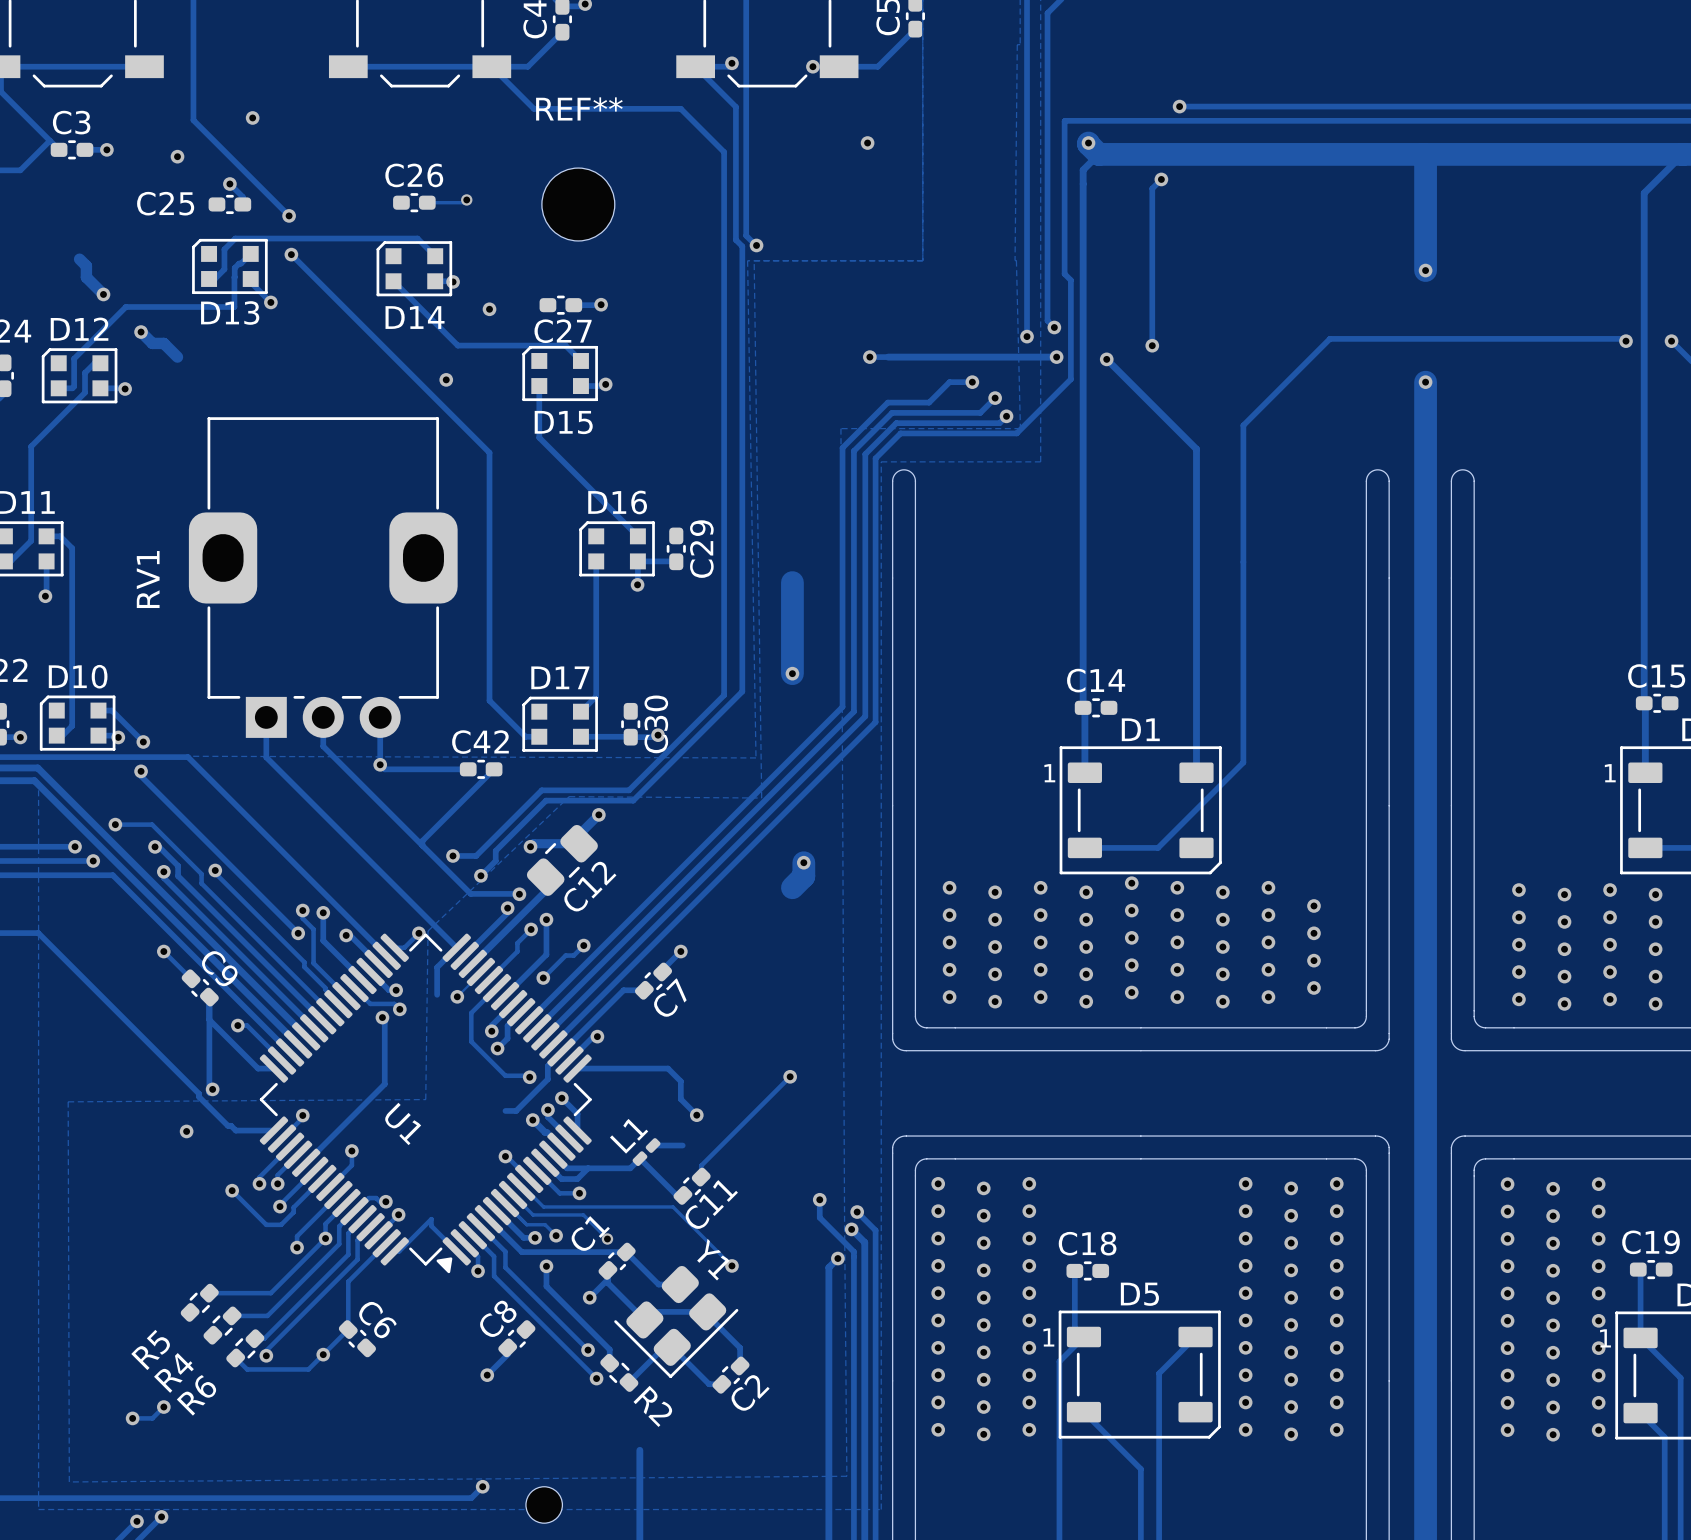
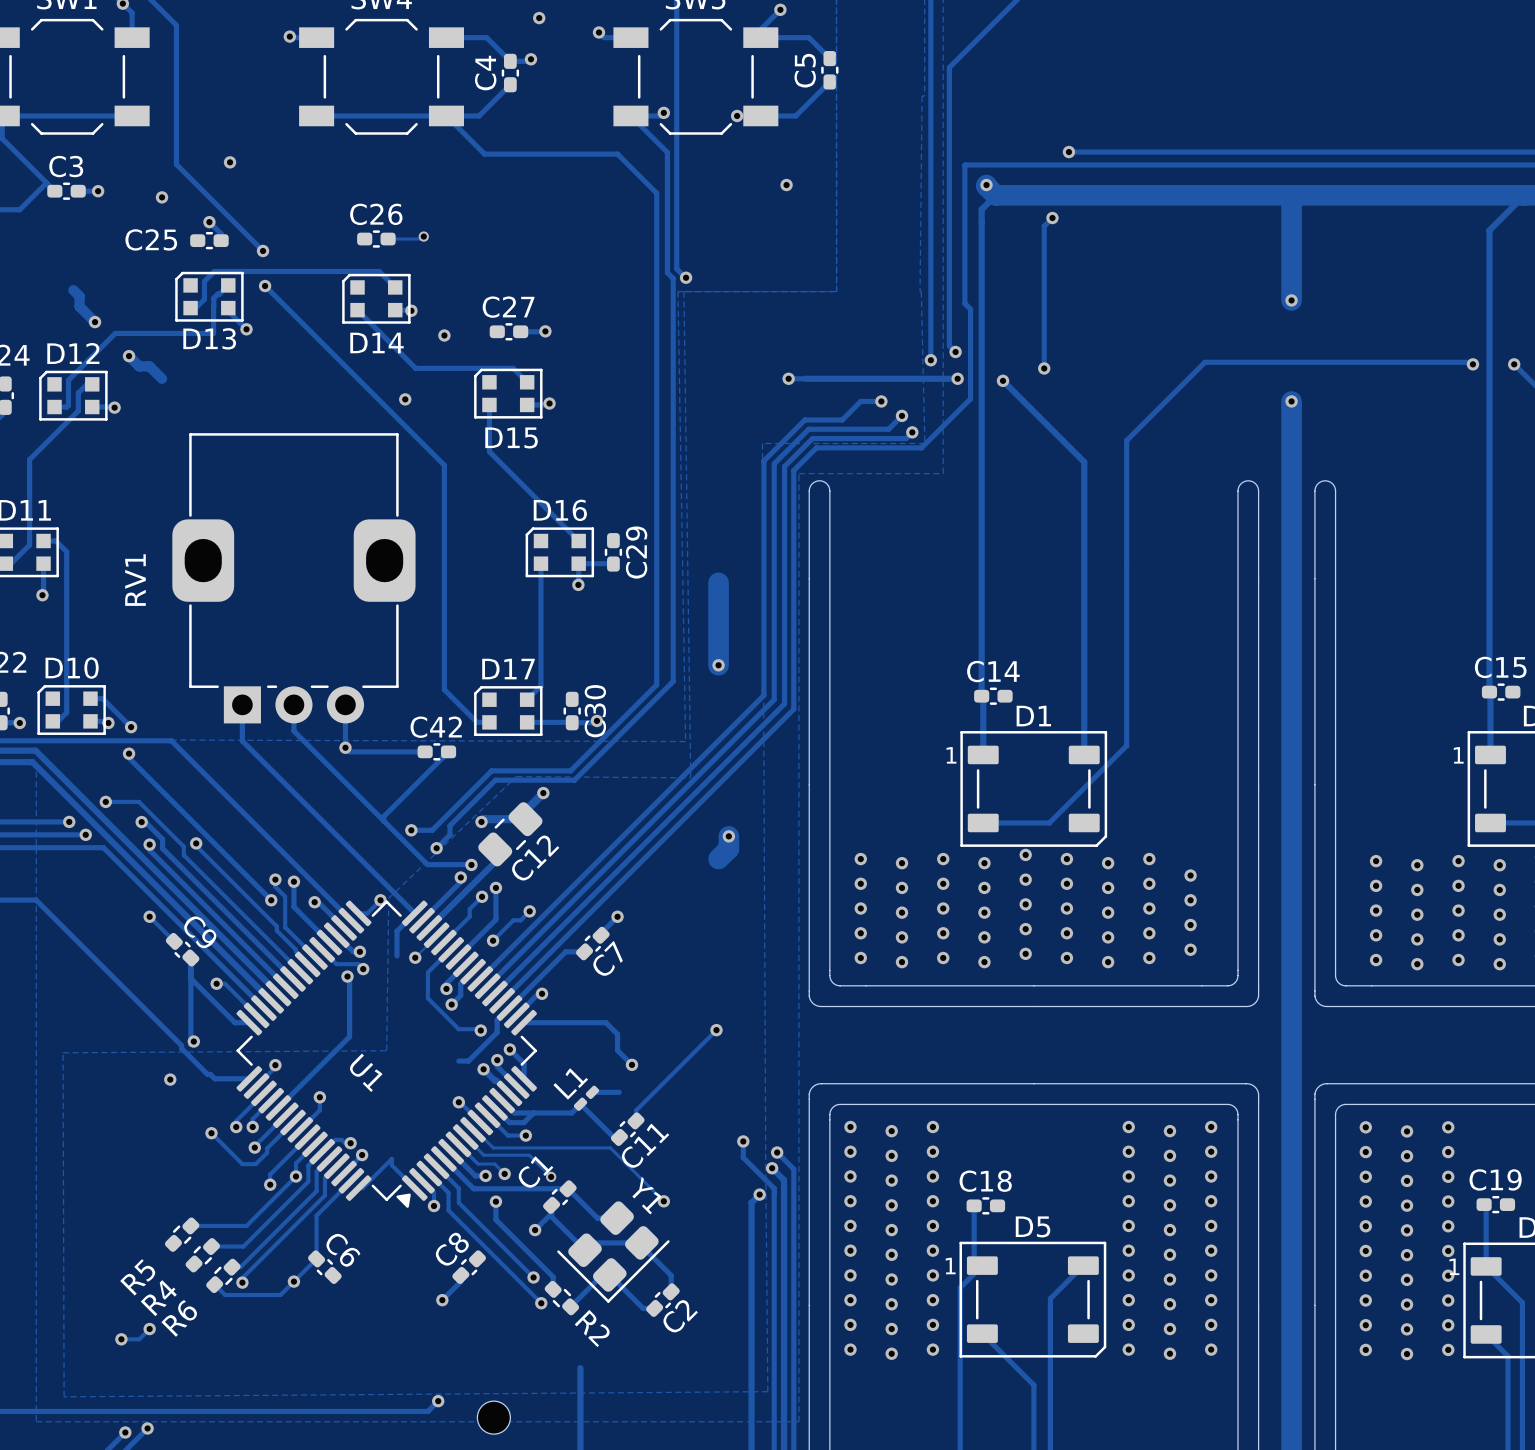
REF**: (578, 204) -> none
C27 name position: C27 (563, 331) -> C27 (508, 307)

